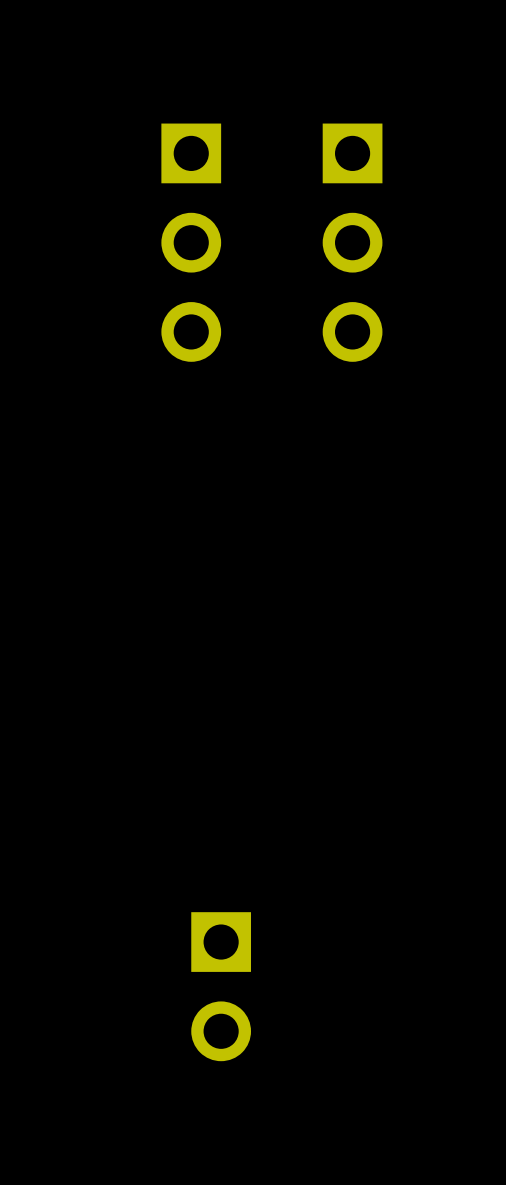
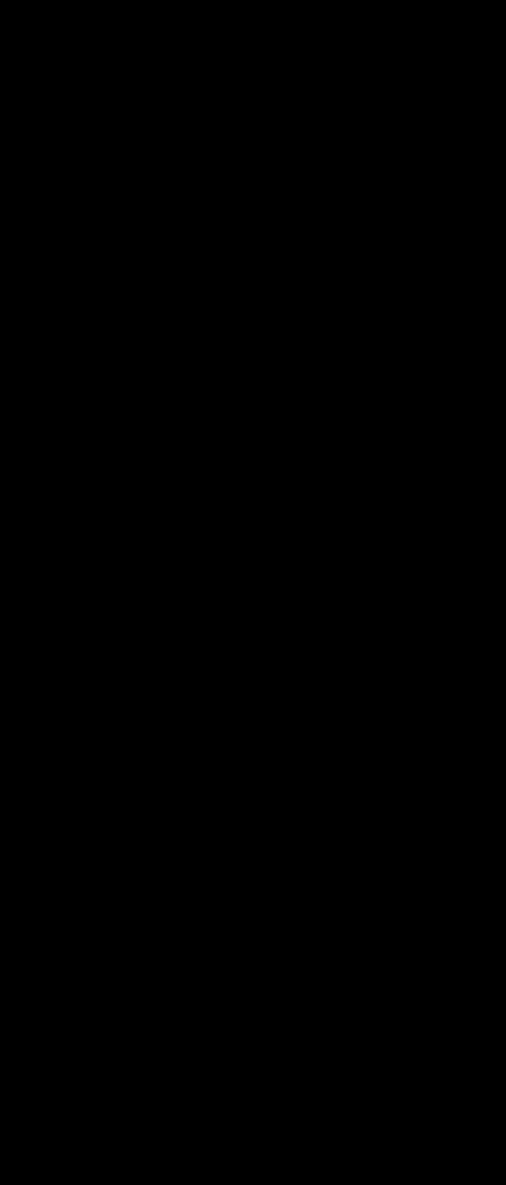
part: (191, 242) -> none
part: (352, 242) -> none
part: (221, 986) -> none

